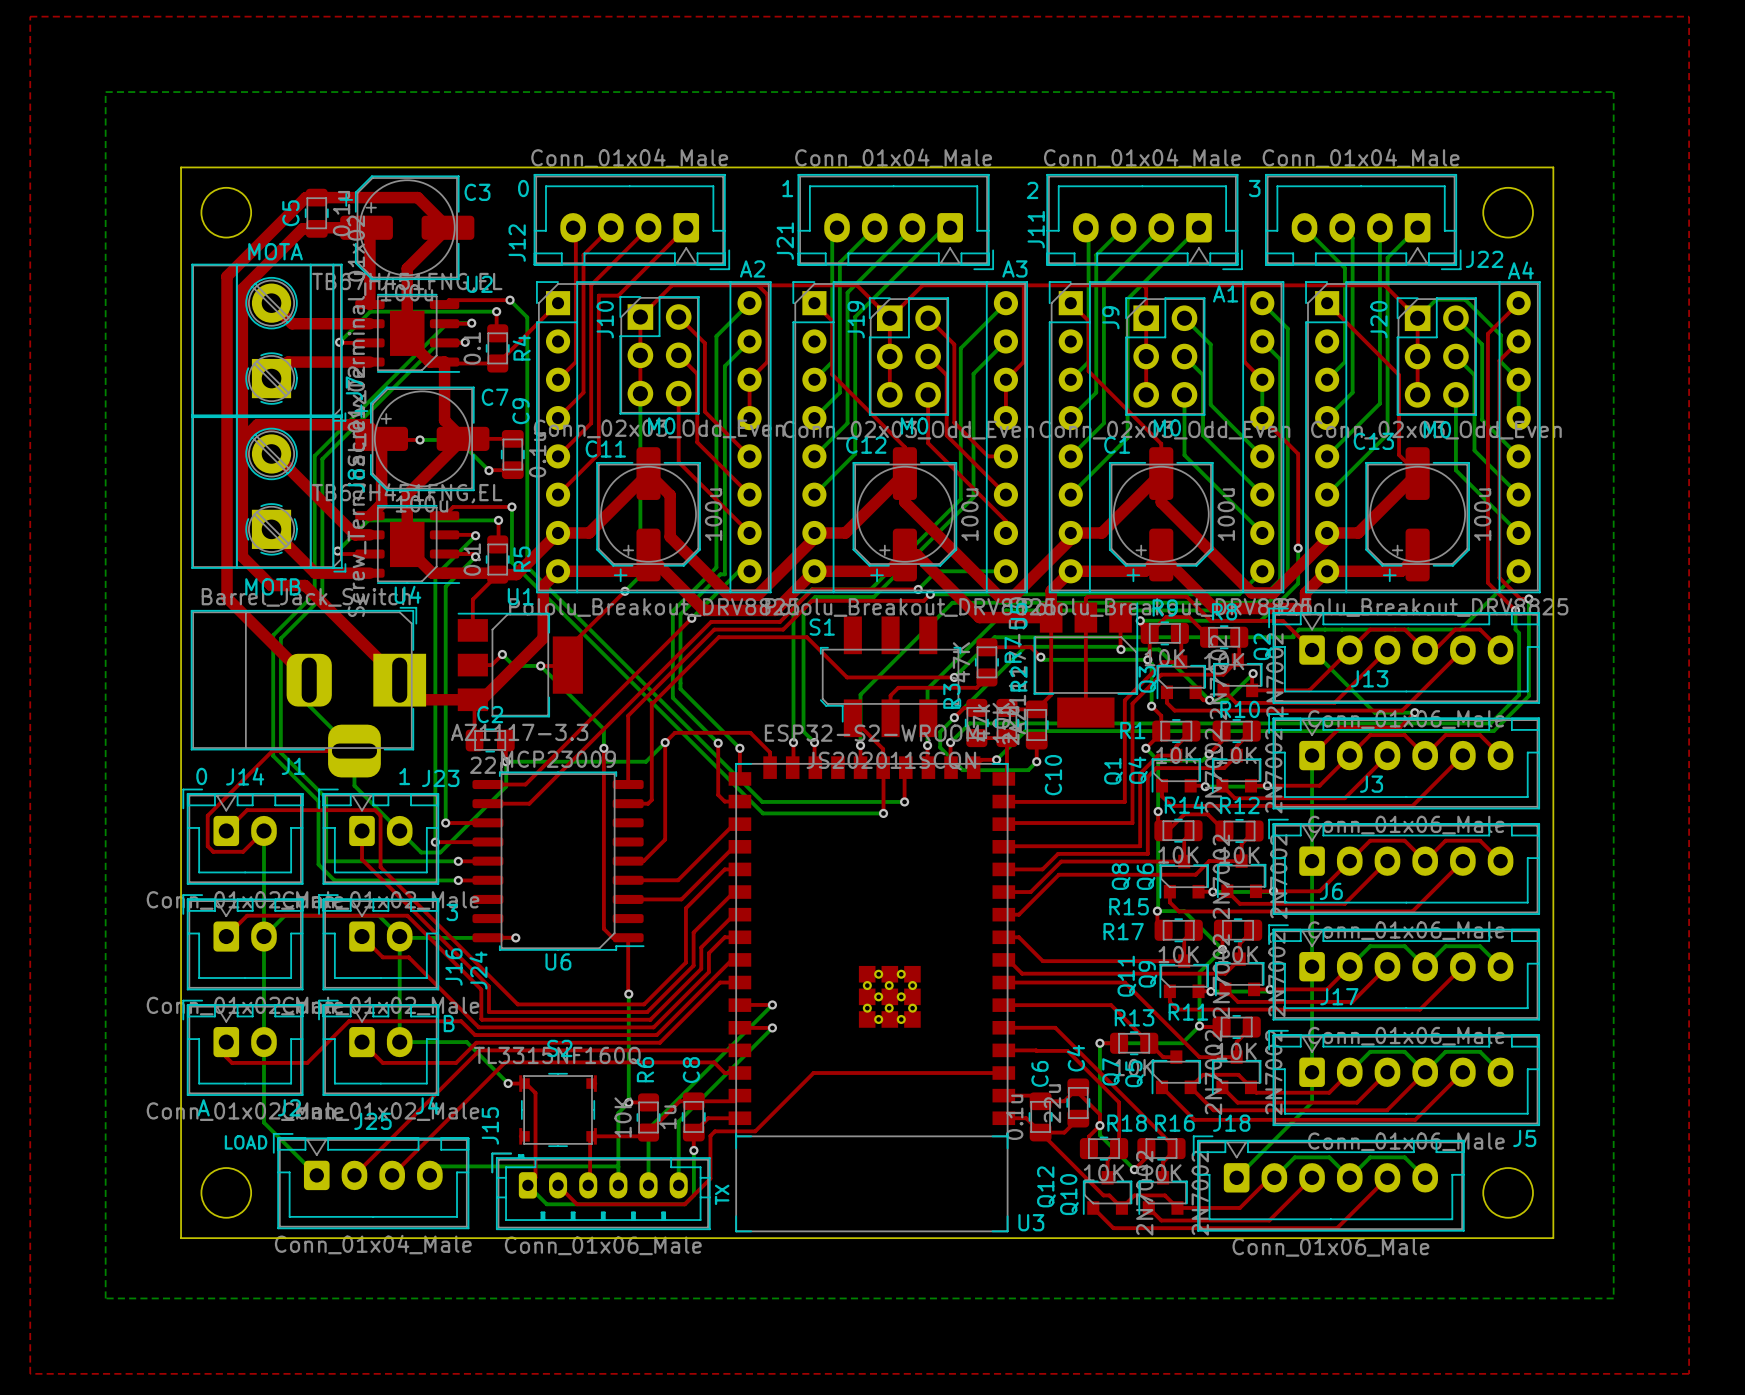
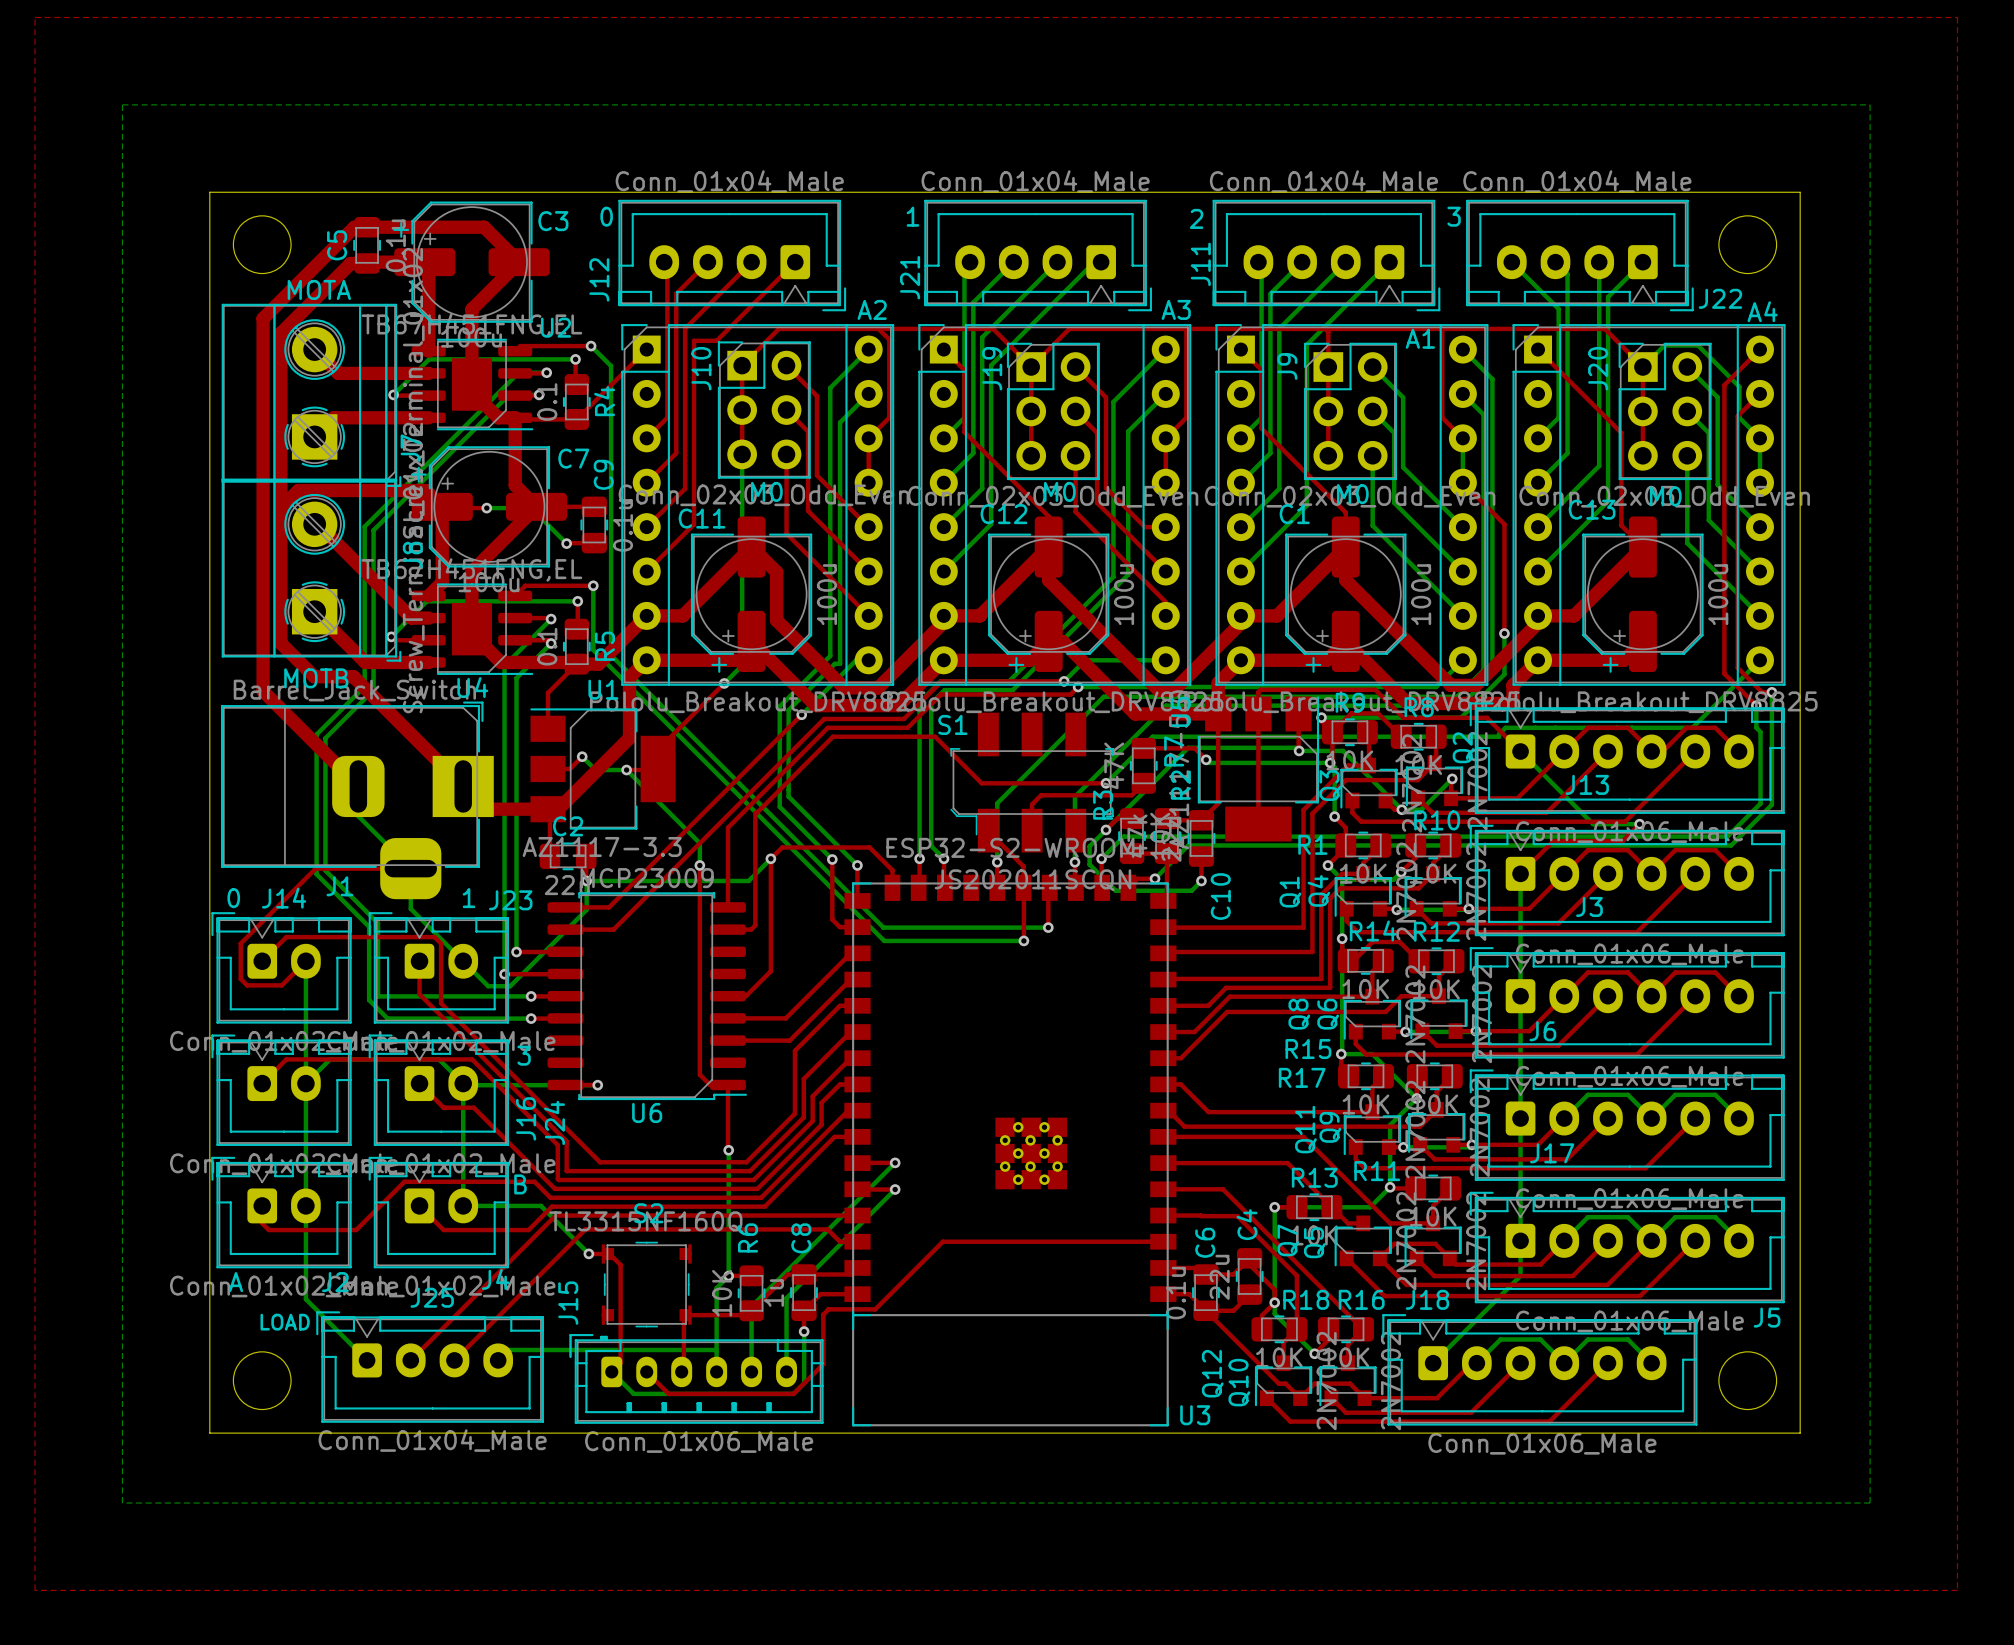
text: TX (722, 1194) -> none

